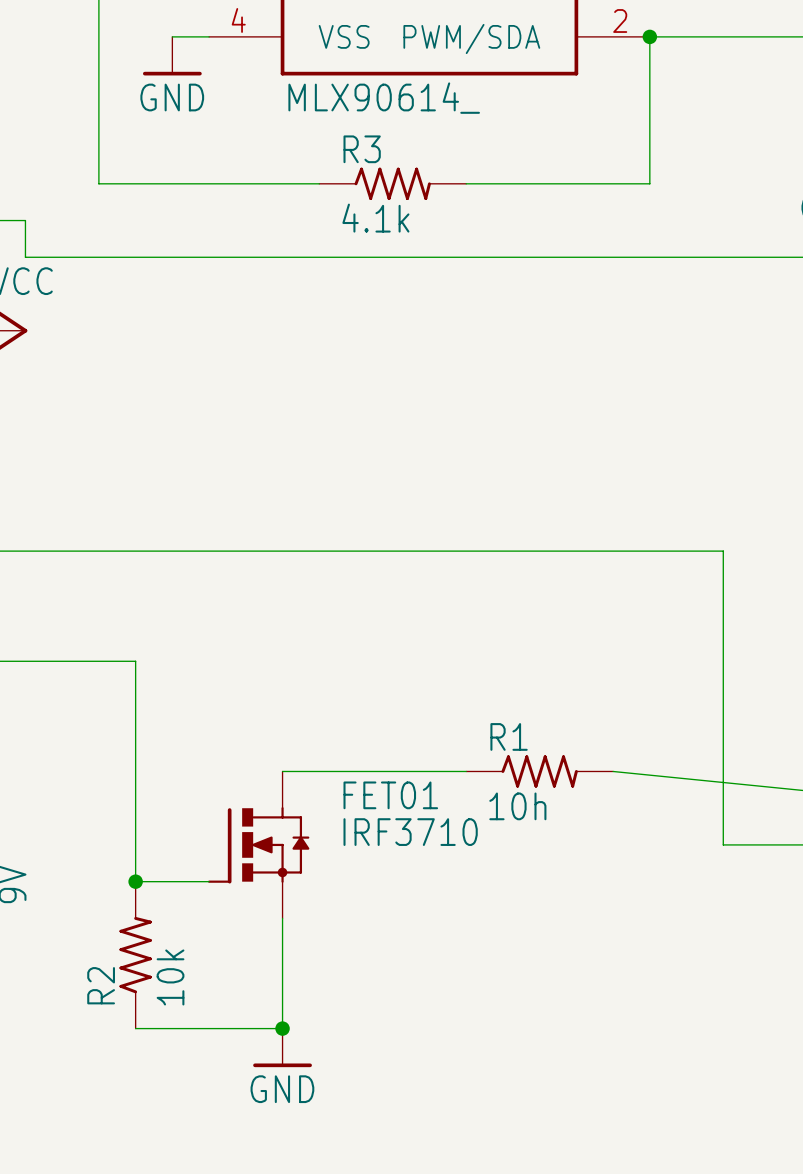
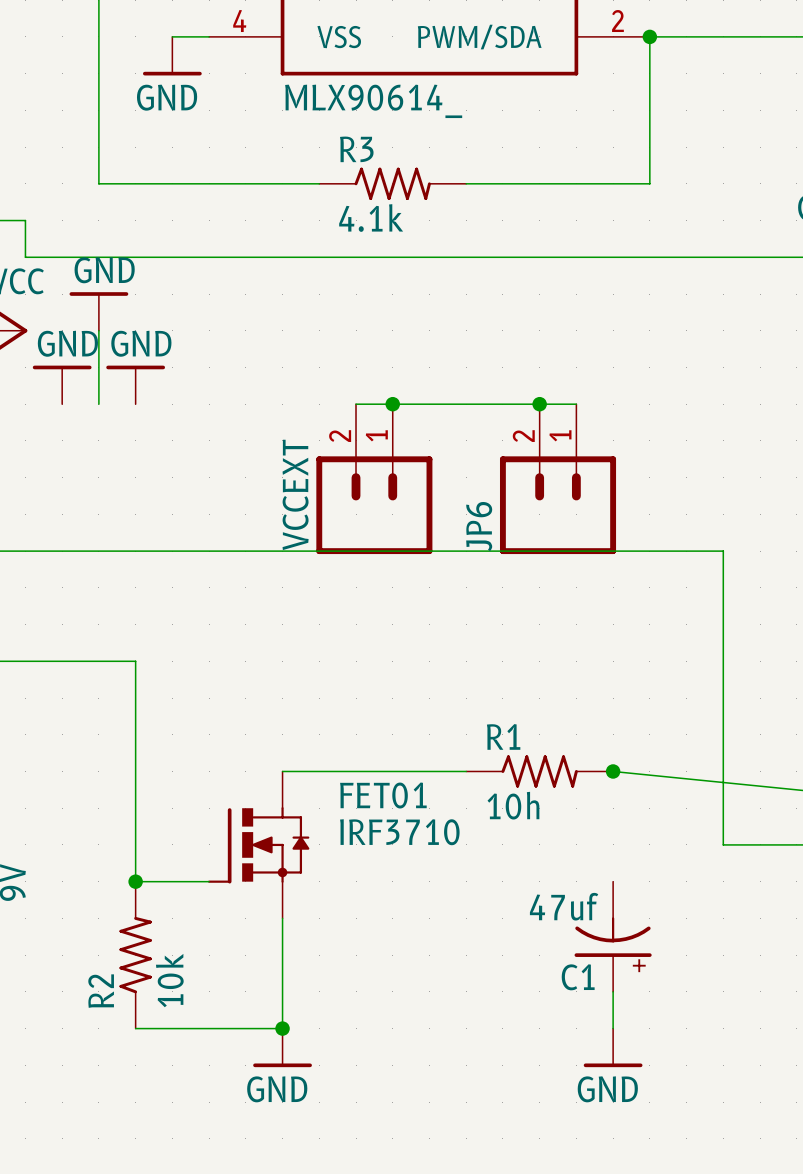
power symbol: none -> GND (98, 311)
wire: none -> (98, 330) (98, 404)
power symbol: none -> GND (62, 384)
power symbol: none -> GND (135, 384)
wire: none -> (356, 404) (576, 404)
junction: none -> (392, 404)
junction: none -> (539, 404)
VCCEXT: none -> (374, 479)
JP6: none -> (558, 479)
junction: none -> (613, 771)
C1: none -> 47uf (613, 936)
wire: none -> (613, 991) (613, 1028)
power symbol: none -> GND (613, 1047)

